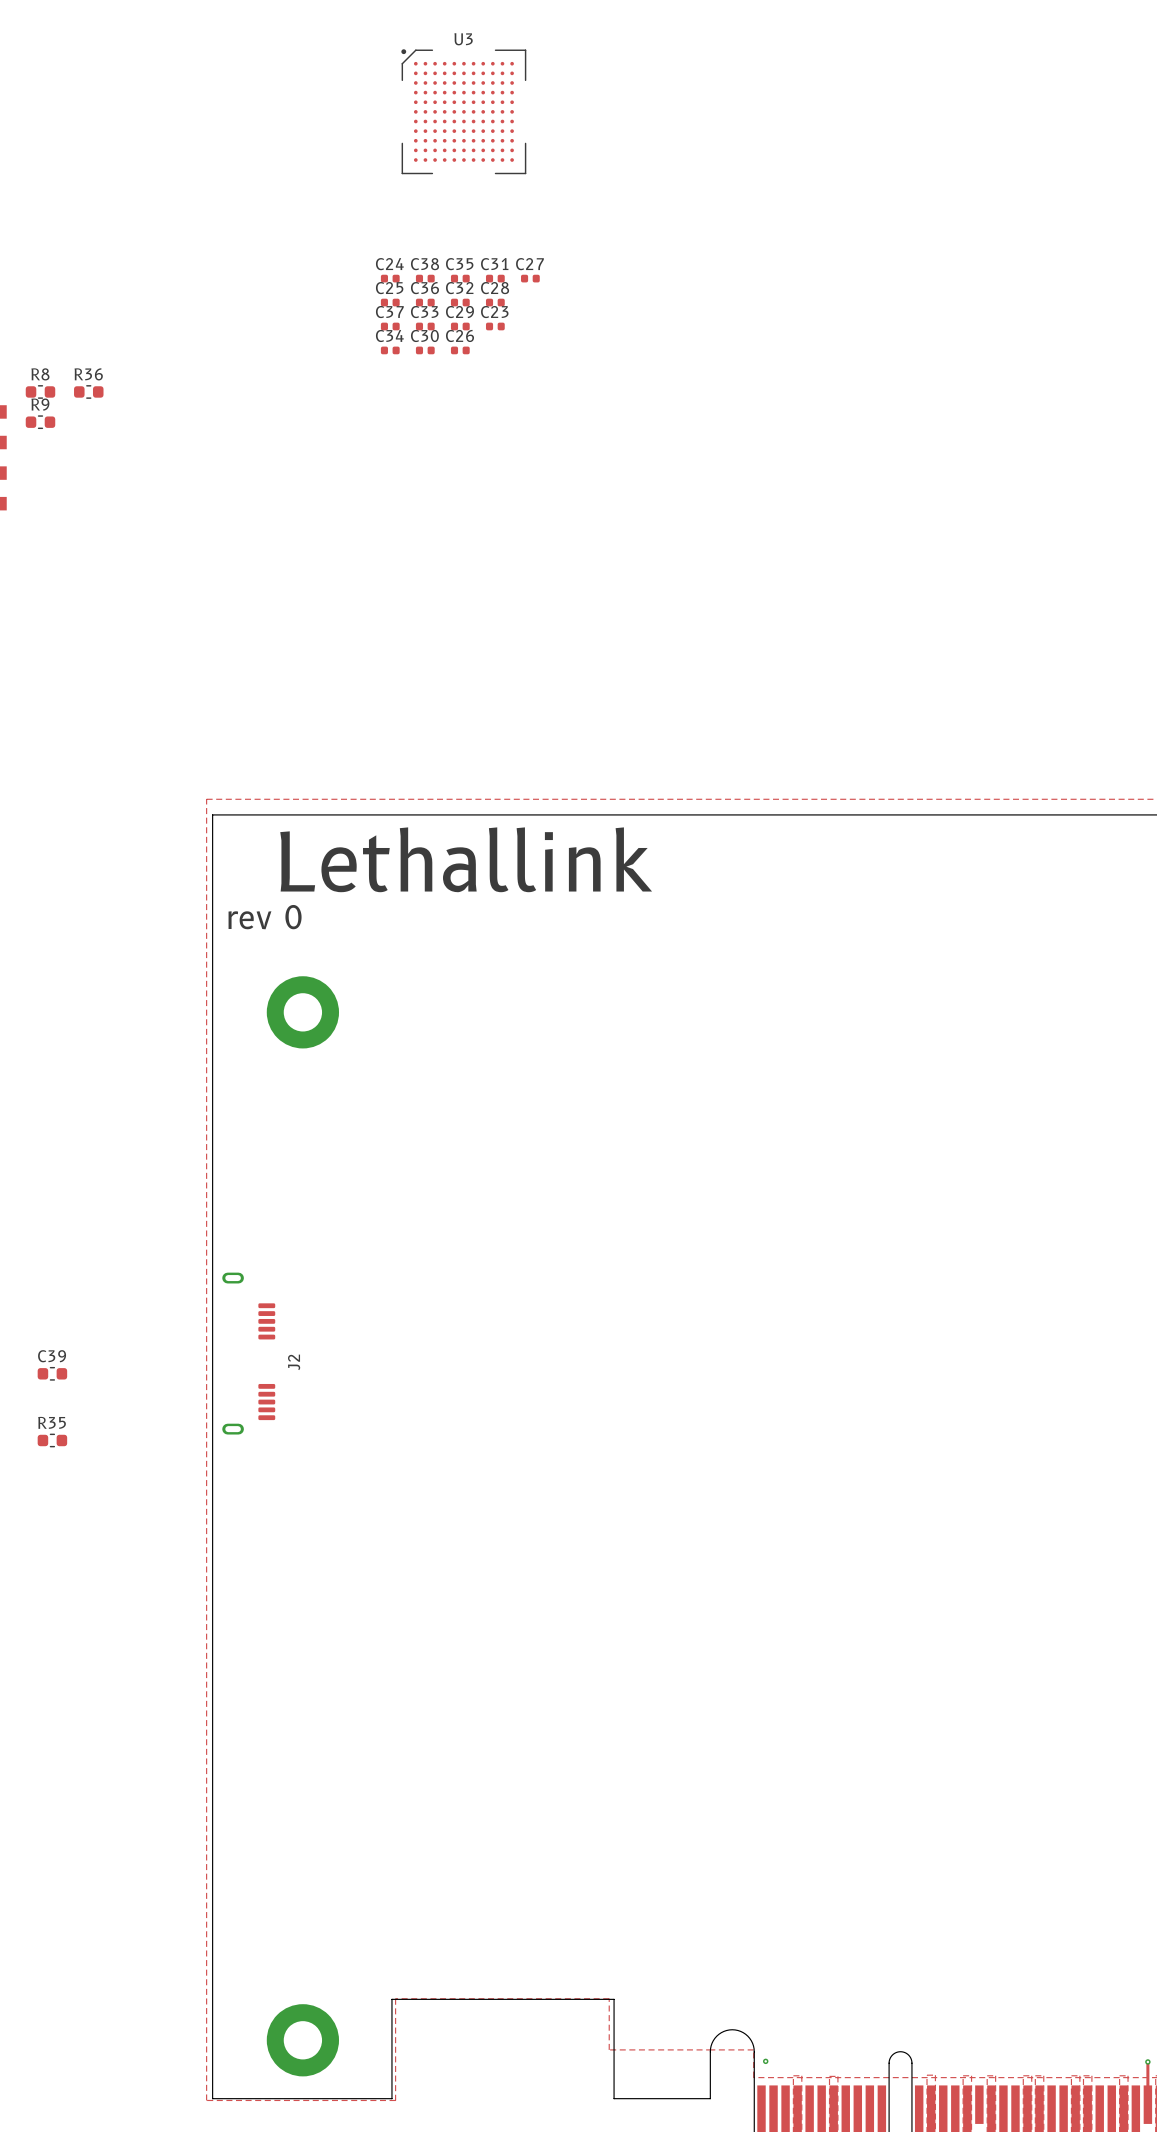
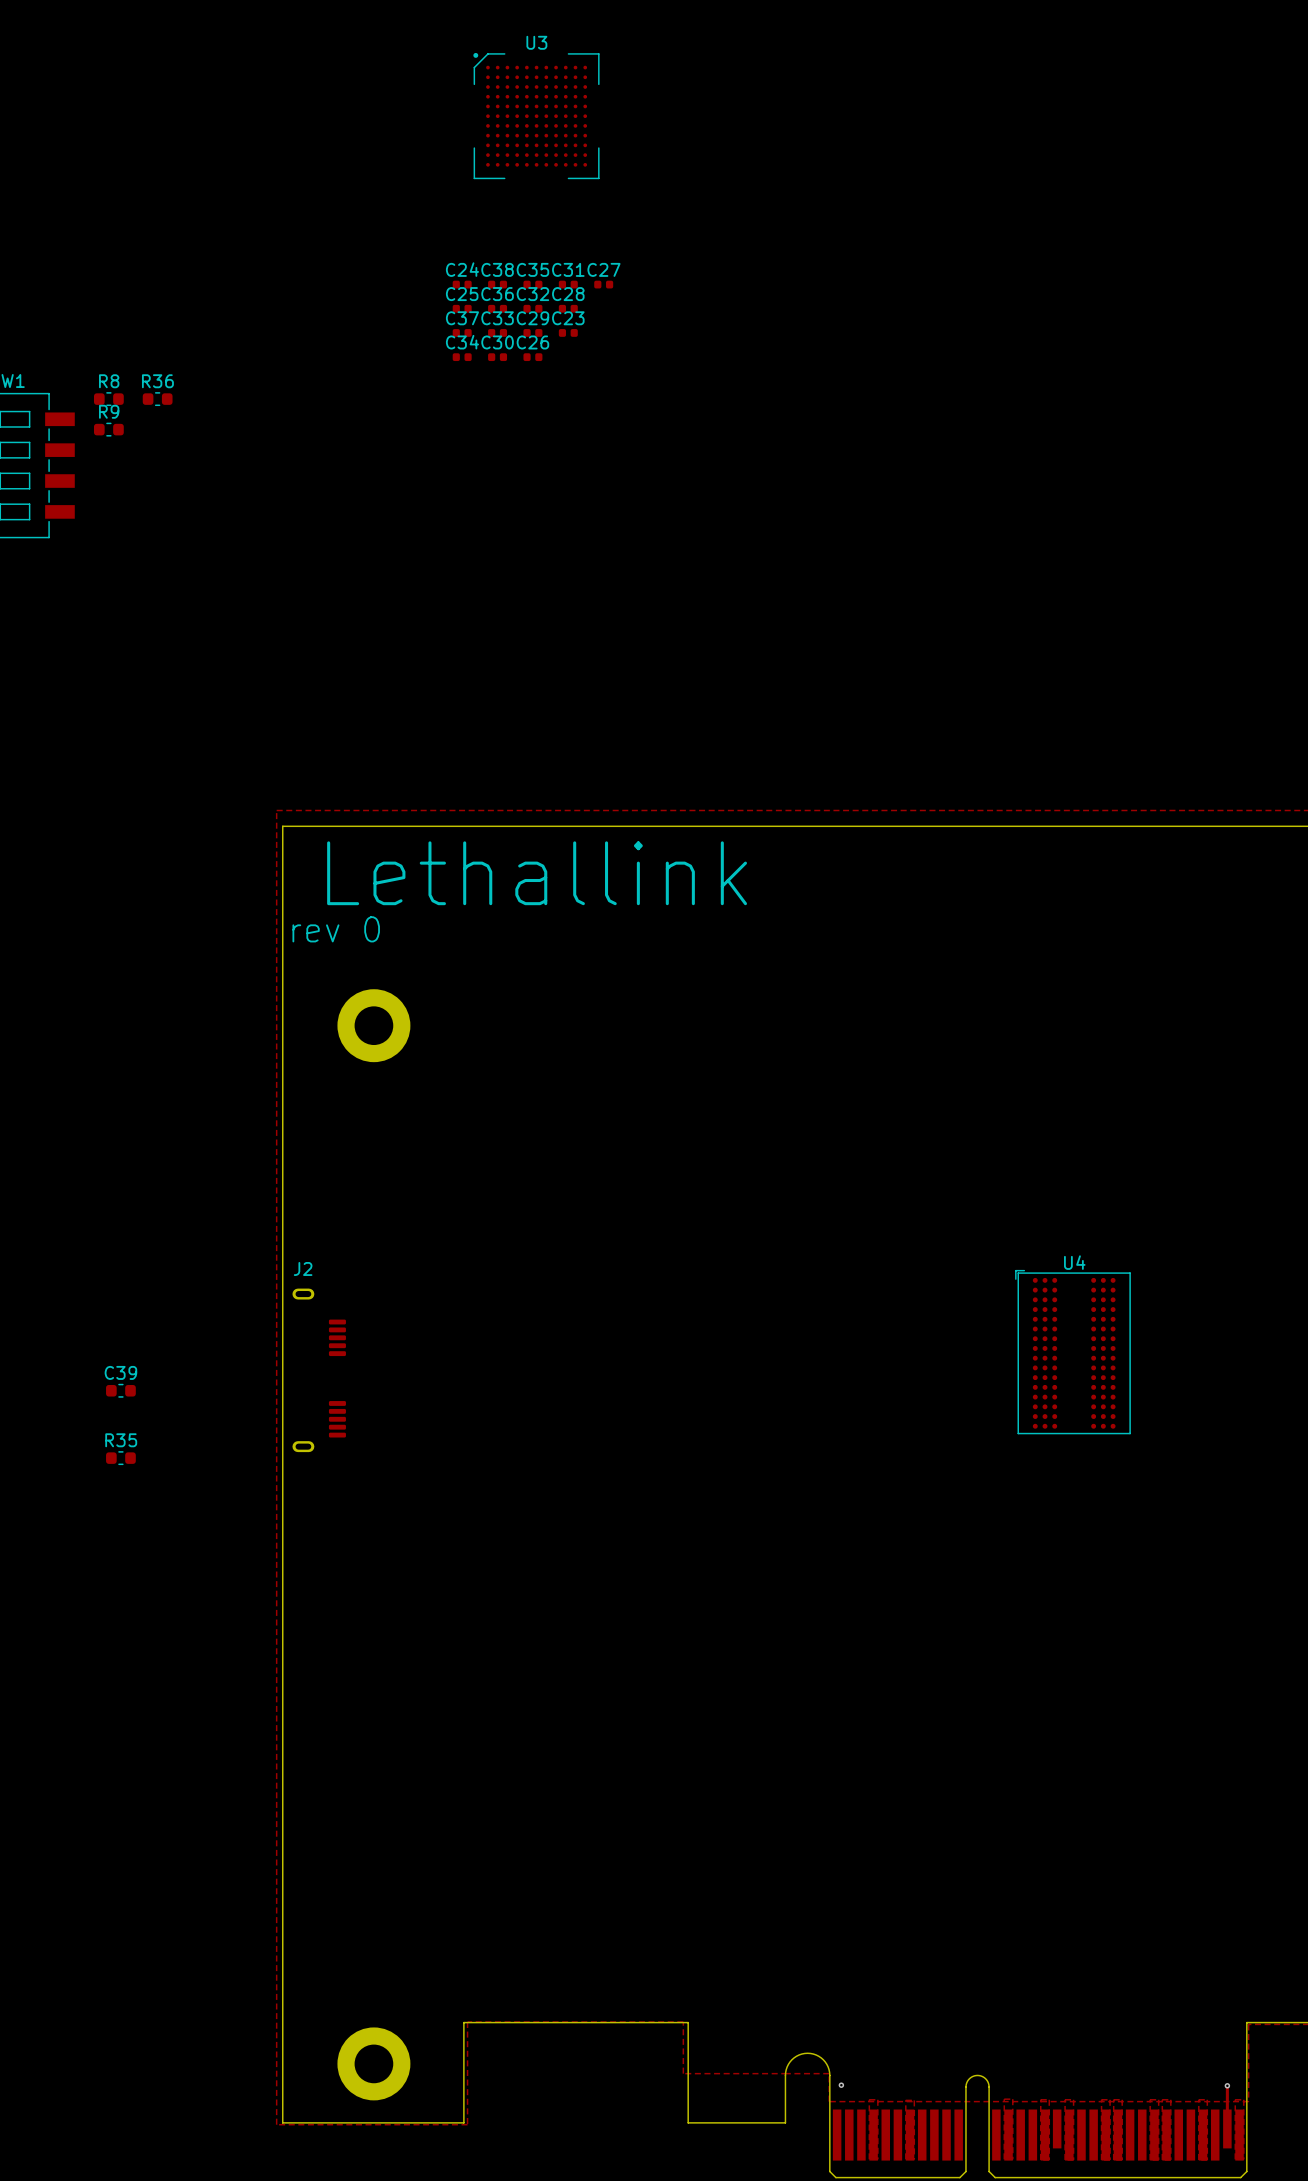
U4: none -> (1072, 1352)
J2 name rotation: 0° (294, 1362) -> 90° clockwise (303, 1268)
J2 name position: J2 (294, 1362) -> J2 (303, 1268)

